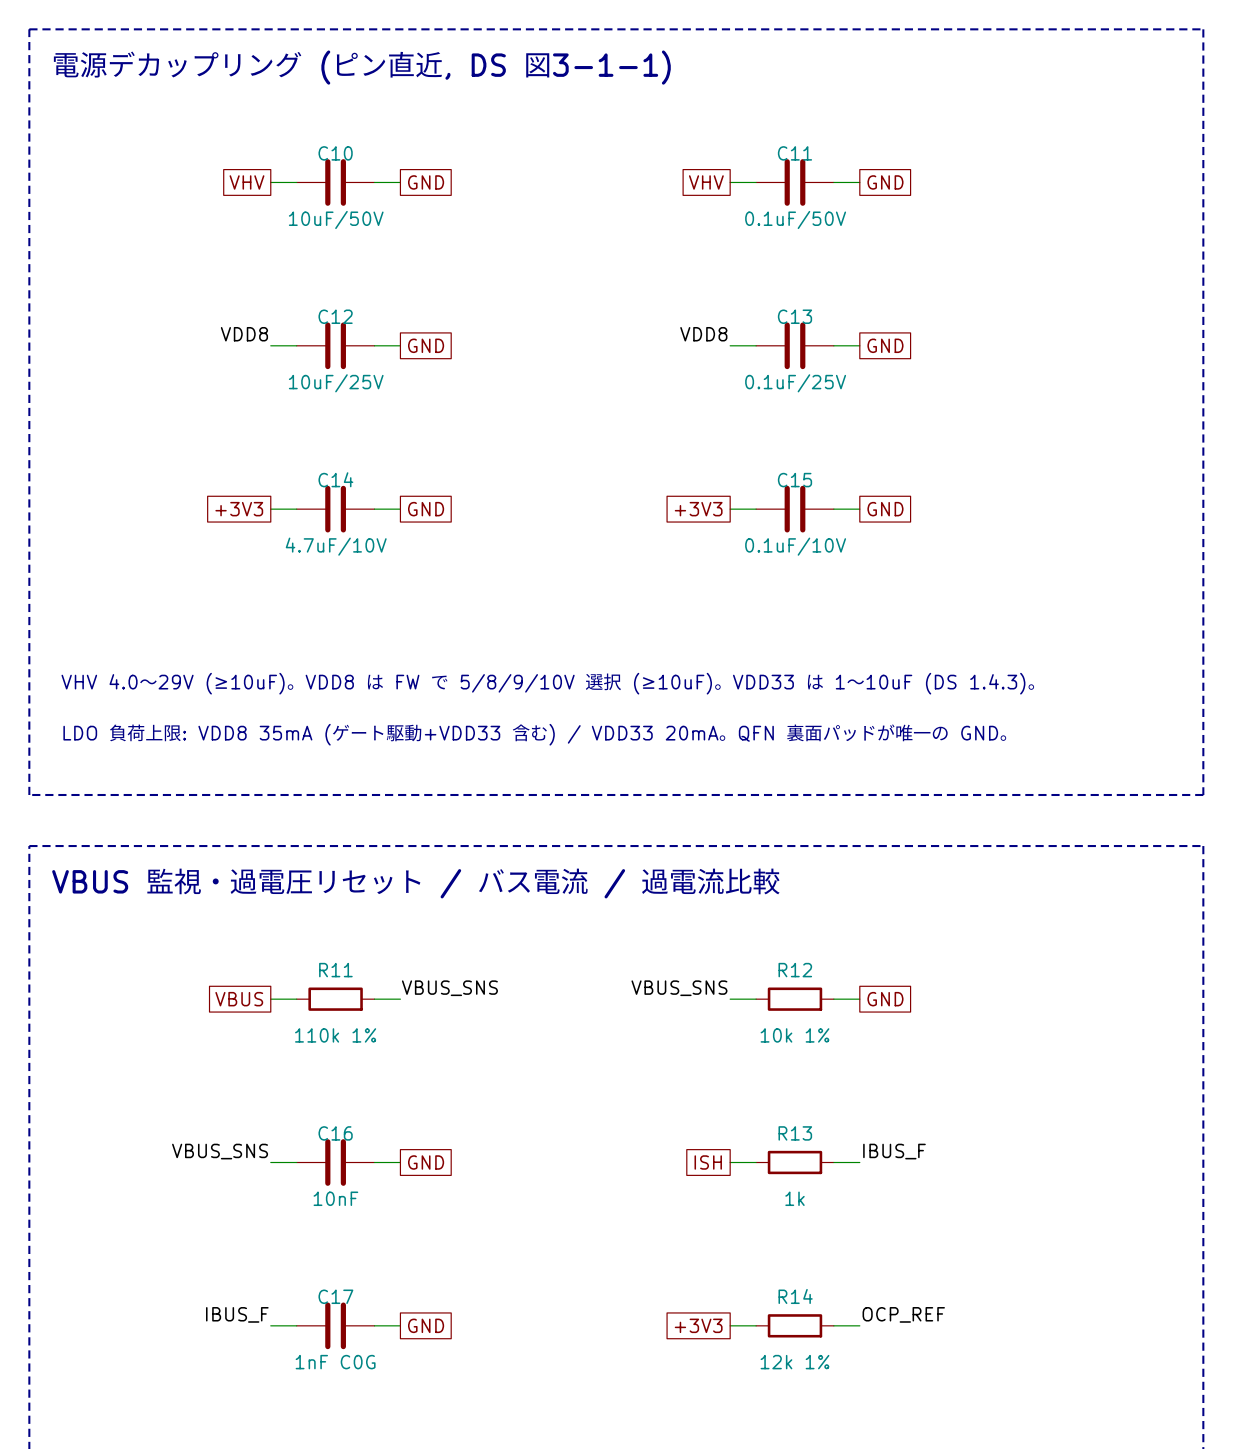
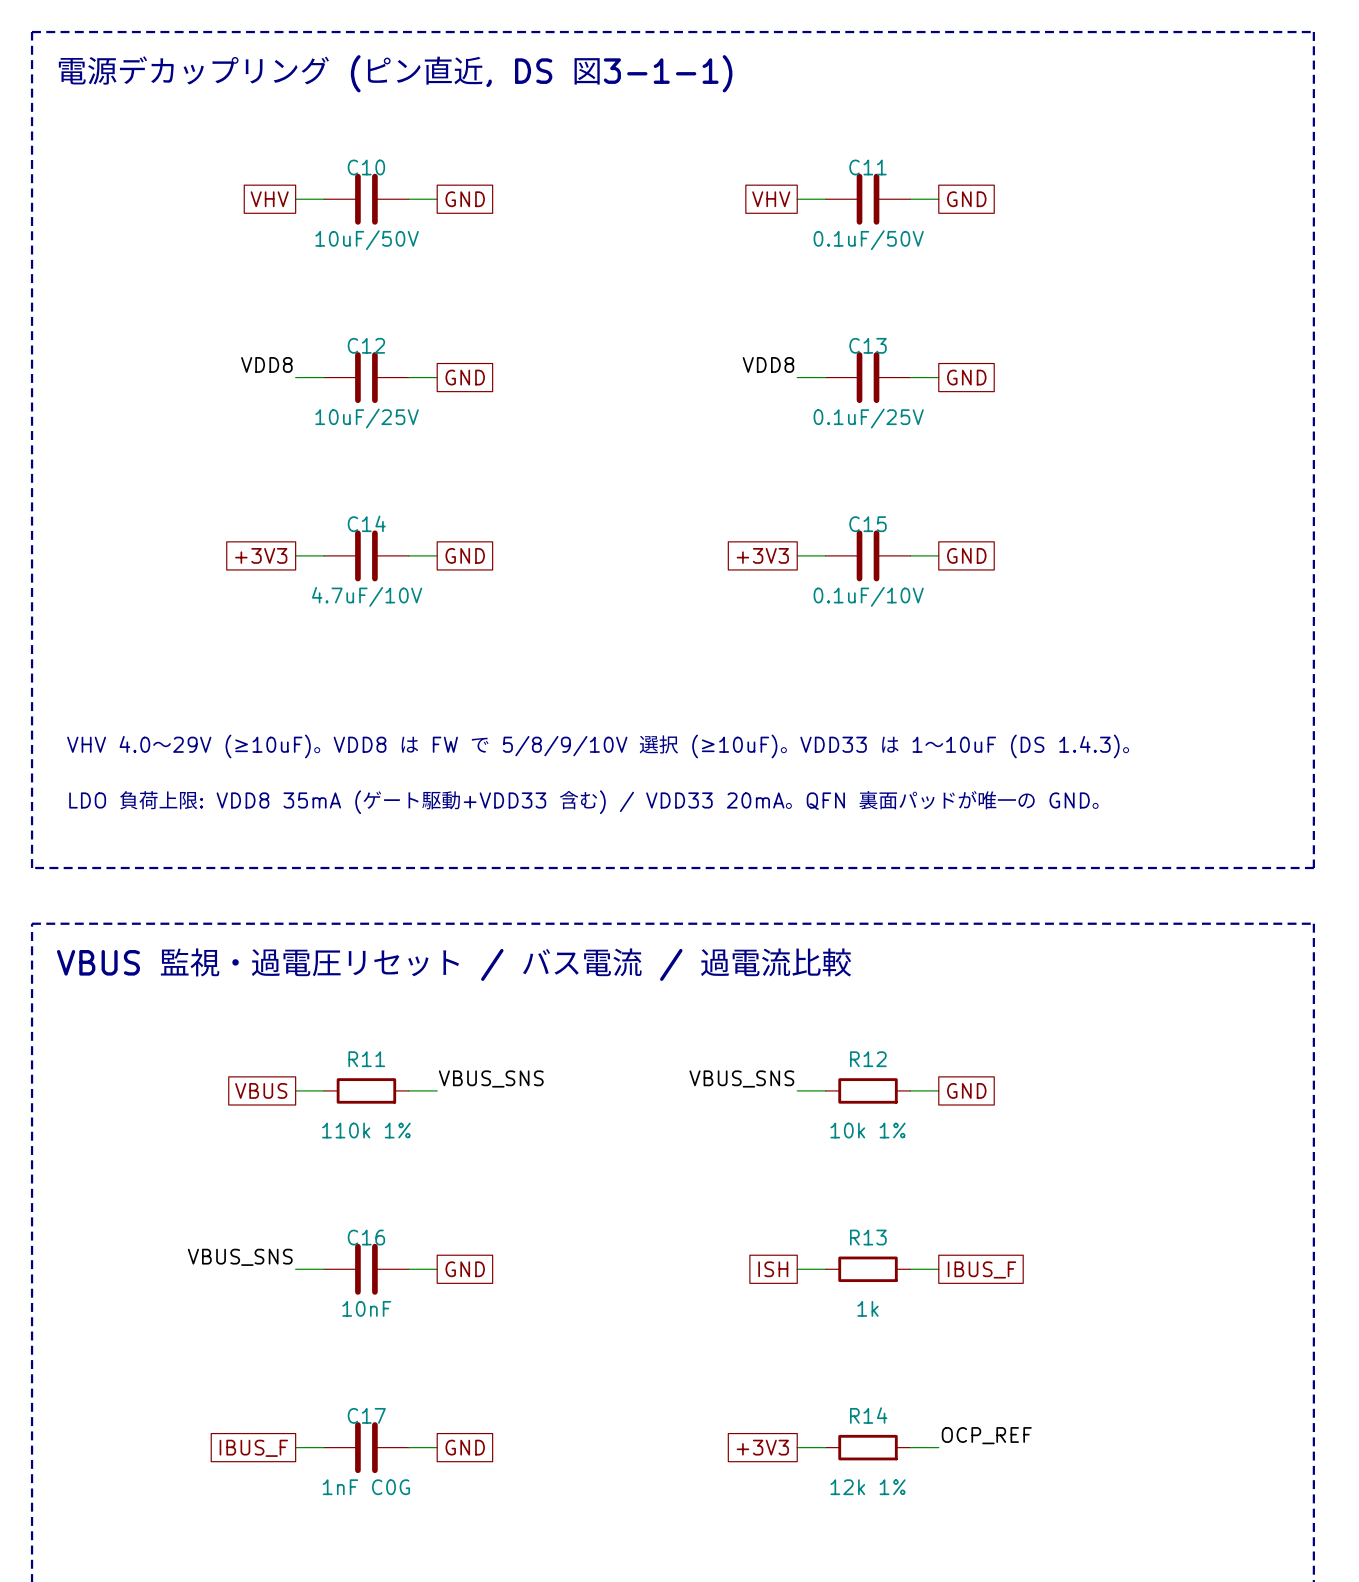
label: IBUS_F (894, 1151) -> none
global label: none -> IBUS_F (981, 1269)
label: IBUS_F (237, 1314) -> none
global label: none -> IBUS_F (253, 1448)

